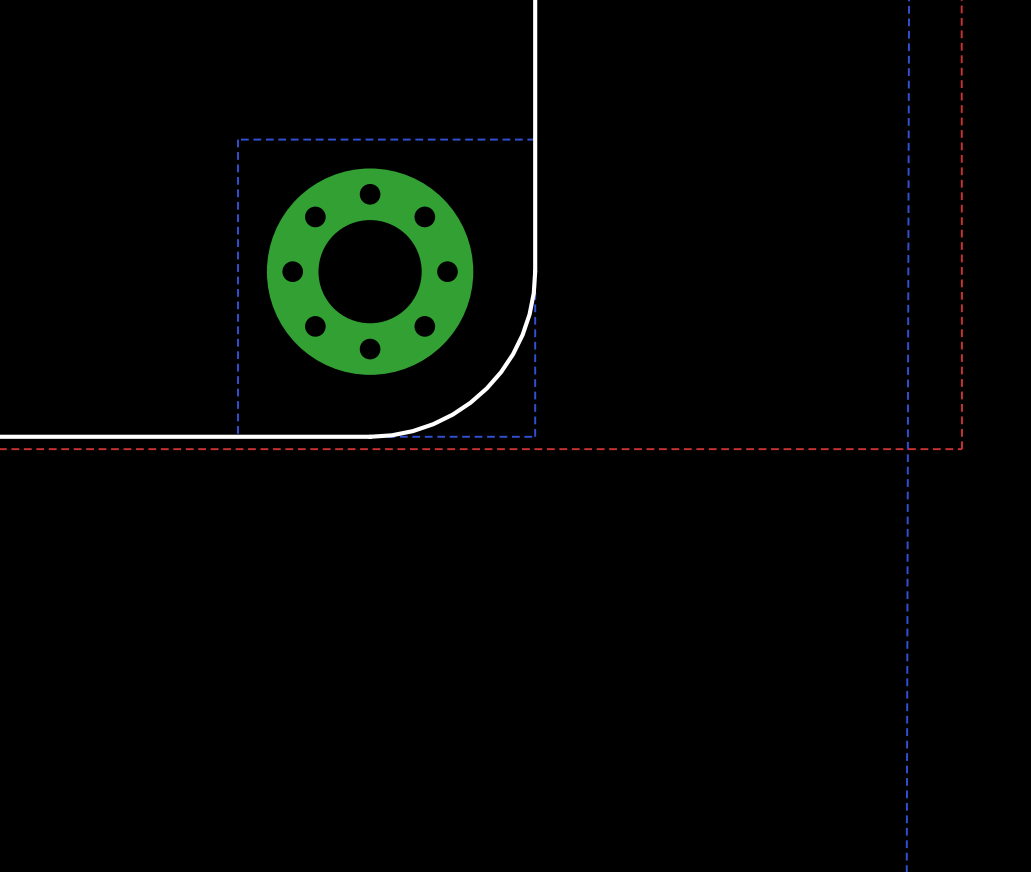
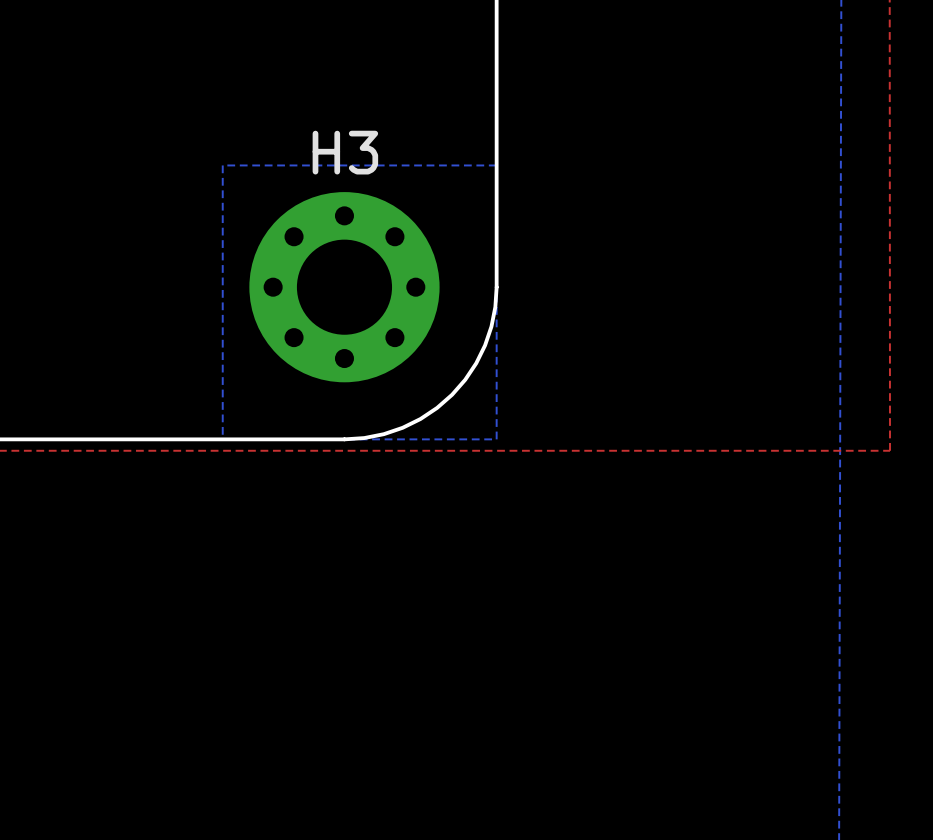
H3 name: none -> H3 (345, 152)

